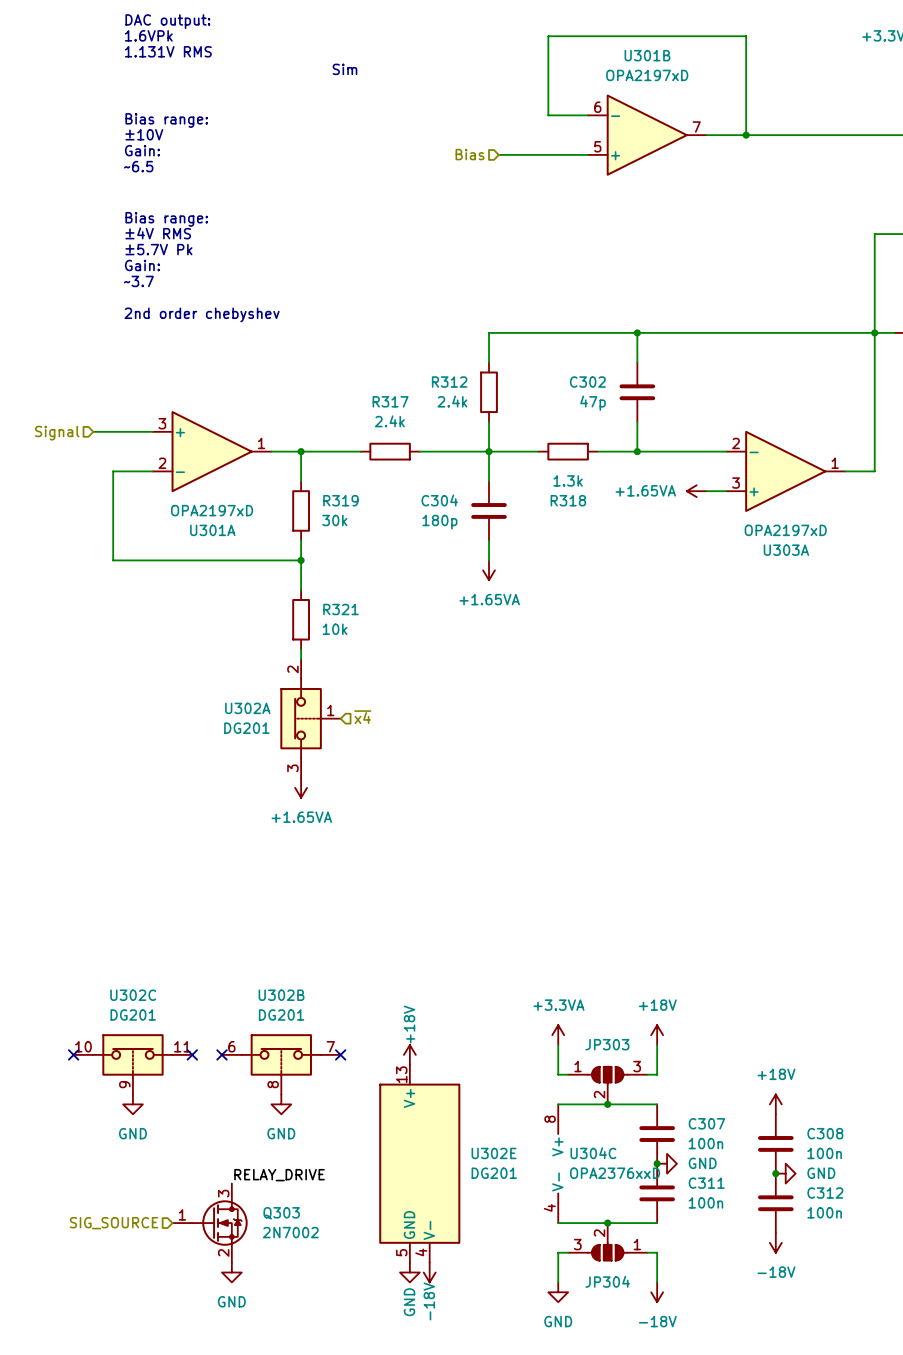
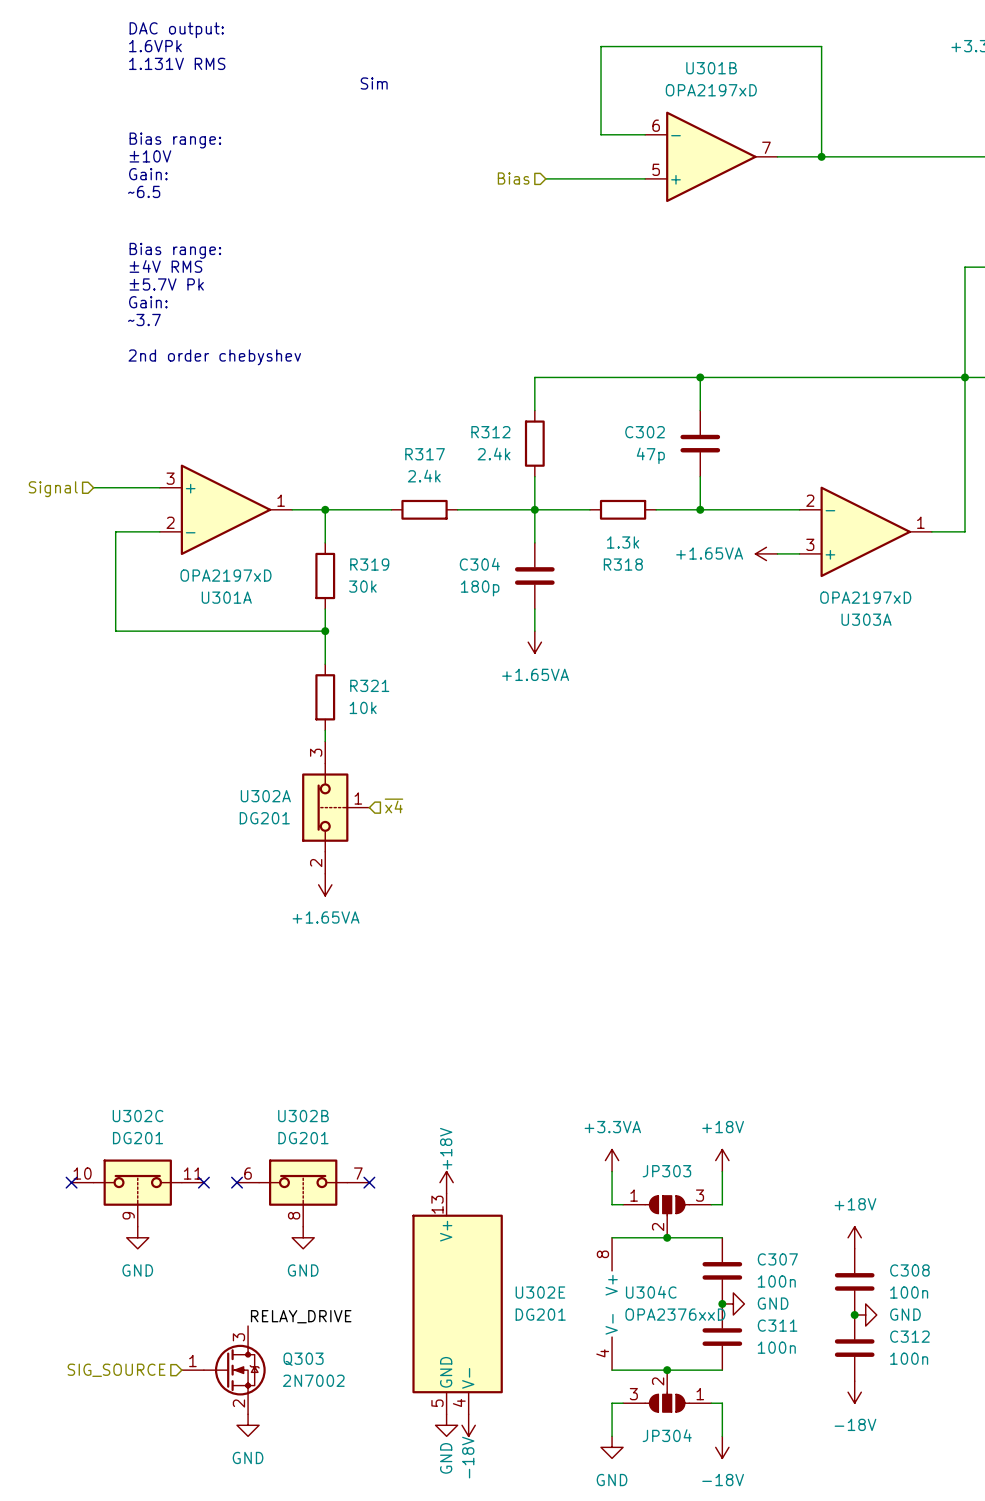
U302A flip: as is (301, 718) -> up-down (325, 807)

